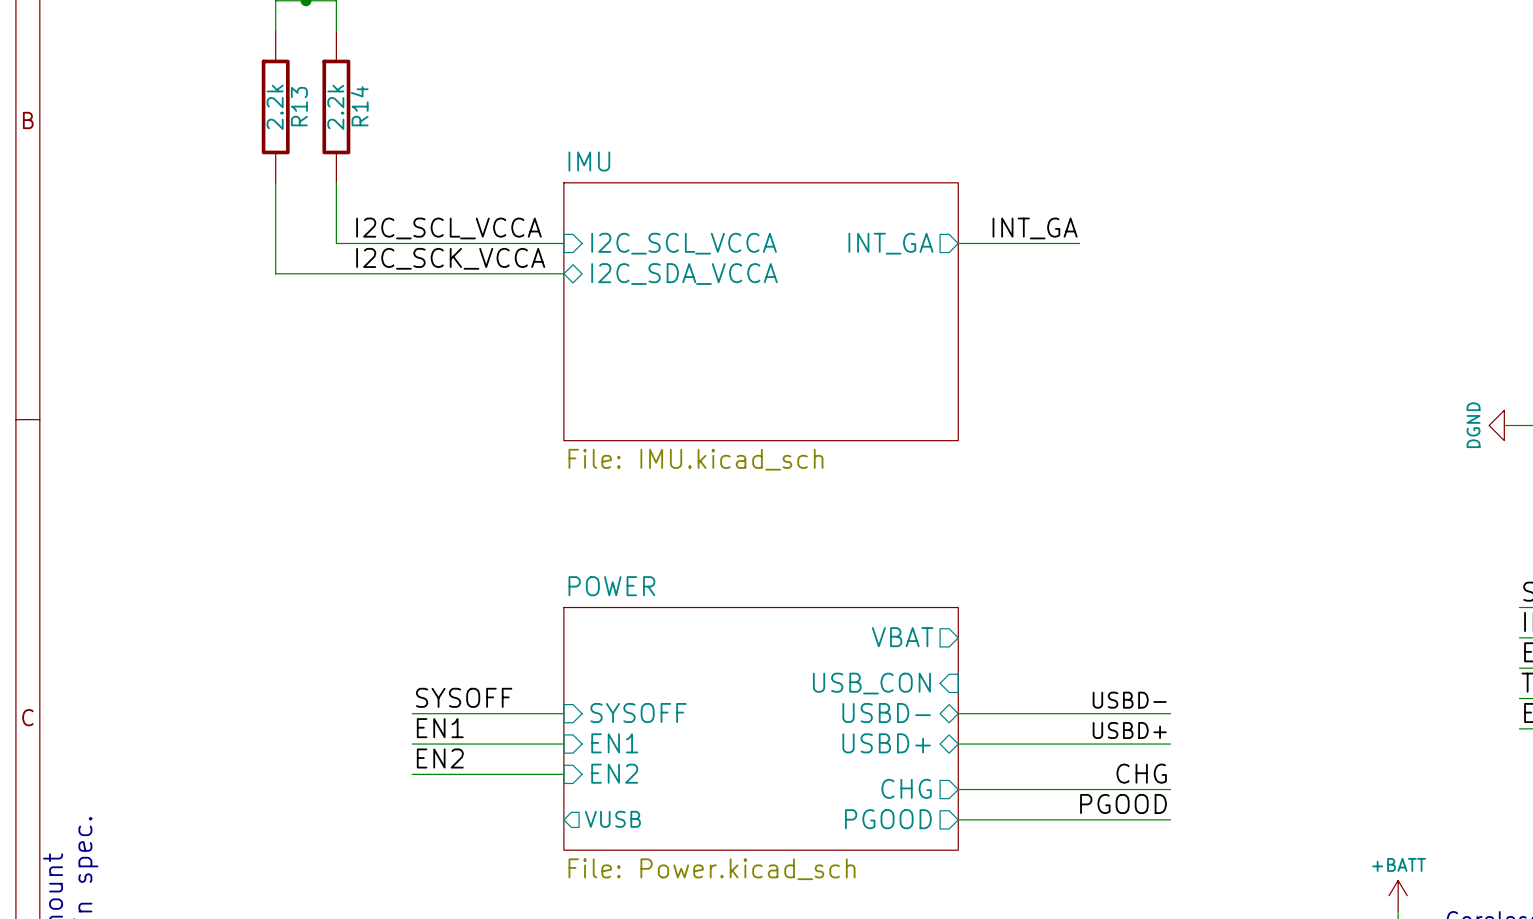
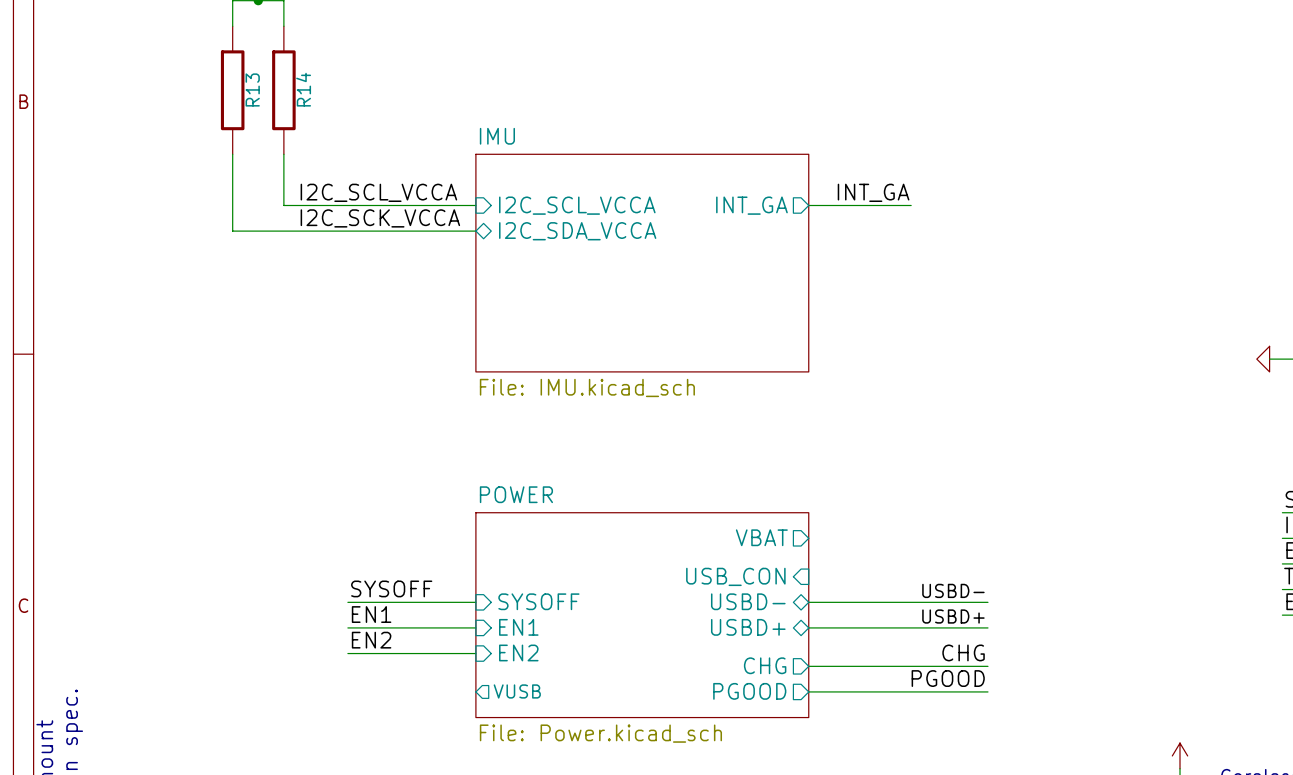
R13 value: 2.2k (275, 107) -> none
R14 value: 2.2k (335, 107) -> none
power symbol text: DGND (1473, 425) -> none
power symbol text: +BATT (1399, 864) -> none

